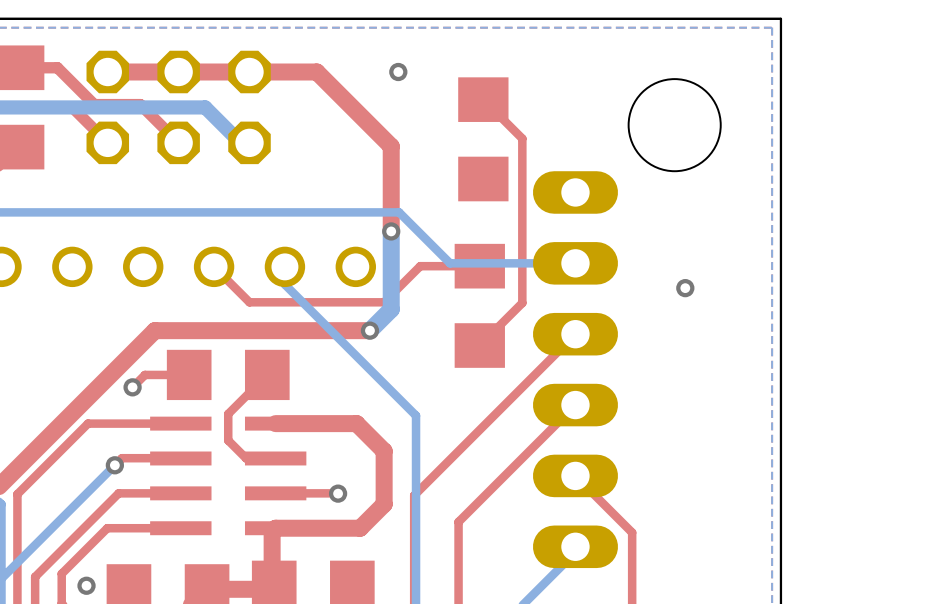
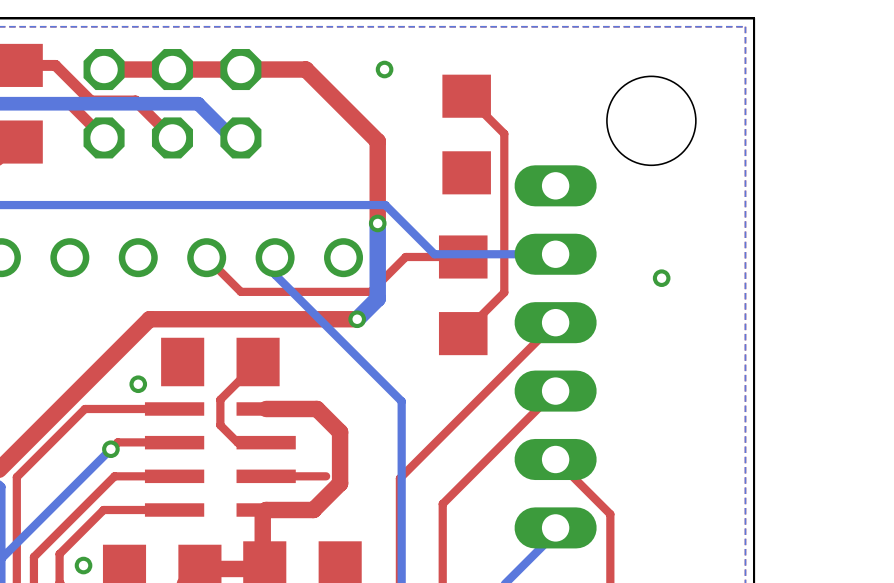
top track: (189, 374) (144, 374) (132, 387) -> none
via position: (132, 387) -> (138, 384)
top track: (328, 423) (356, 423) (384, 451) (384, 504) (360, 528) (324, 528) -> (316, 408) (340, 432) (340, 483) (313, 510)
via: (338, 493) -> none

